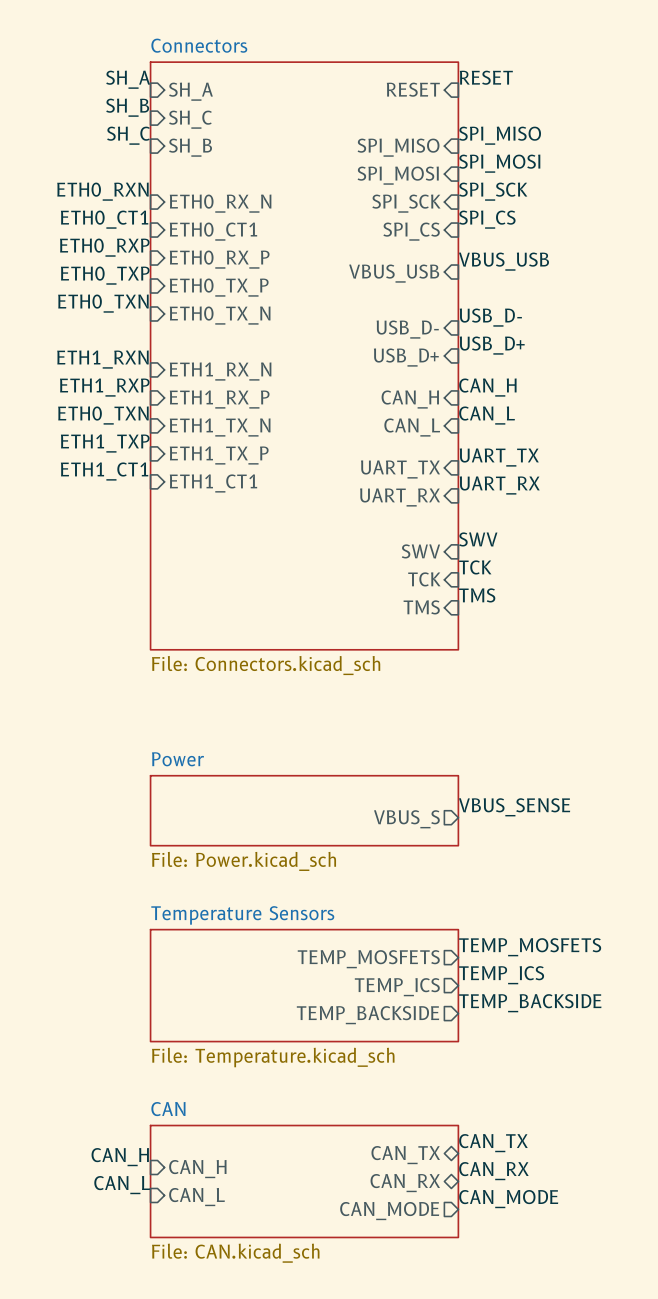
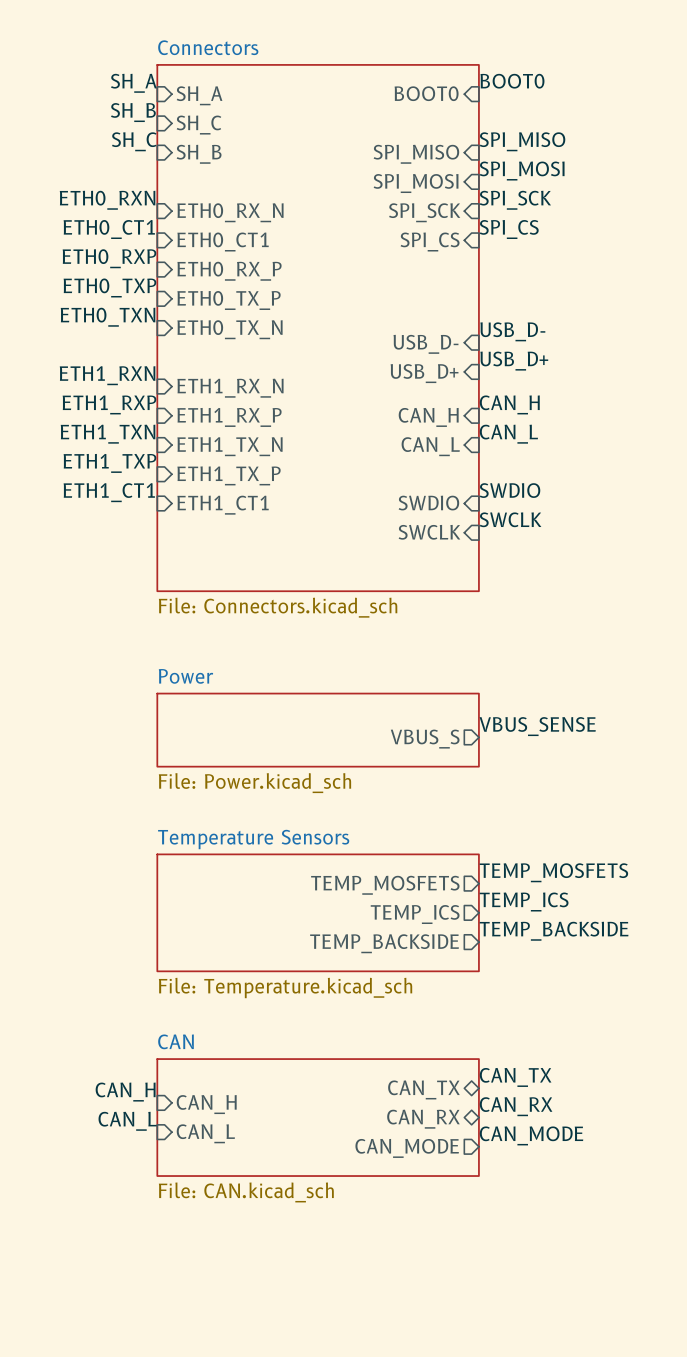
label: RESET (486, 77) -> BOOT0 (512, 81)
sheet pin: RESET (413, 89) -> BOOT0 (426, 93)
label: VBUS_USB (503, 261) -> none
sheet pin: VBUS_USB (394, 273) -> none
sheet Connectors: none -> File: Connectors.kicad_sch (318, 328)
sheet Connectors: File: Connectors.kicad_sch (304, 355) -> none
label: ETH0_TXN (103, 415) -> ETH1_TXN (108, 434)
label: UART_TX (499, 457) -> none
sheet pin: UART_TX (400, 469) -> none
label: none -> SWDIO (510, 490)
sheet pin: none -> SWDIO (428, 503)
label: UART_RX (499, 485) -> none
sheet pin: UART_RX (400, 497) -> none
label: none -> SWCLK (510, 519)
sheet pin: none -> SWCLK (429, 532)
label: SWV (478, 539) -> none
sheet pin: SWV (420, 551) -> none
label: TCK (475, 567) -> none
sheet pin: TCK (424, 579) -> none
label: TMS (477, 595) -> none
sheet pin: TMS (421, 607) -> none
label position: VBUS_SENSE (514, 807) -> VBUS_SENSE (537, 726)
sheet Power position: (304, 810) -> (318, 730)
sheet pin position: VBUS_S (406, 819) -> VBUS_S (425, 739)
label position: TEMP_MOSFETS (530, 947) -> TEMP_MOSFETS (553, 872)
sheet pin position: TEMP_MOSFETS (368, 959) -> TEMP_MOSFETS (385, 885)
label position: TEMP_ICS (501, 975) -> TEMP_ICS (524, 902)
sheet Temperature Sensors position: (304, 985) -> (318, 912)
sheet pin position: TEMP_ICS (397, 987) -> TEMP_ICS (415, 914)
label position: TEMP_BACKSIDE (530, 1003) -> TEMP_BACKSIDE (554, 931)
sheet pin position: TEMP_BACKSIDE (368, 1015) -> TEMP_BACKSIDE (384, 943)
label position: CAN_TX (493, 1143) -> CAN_TX (515, 1077)
sheet pin position: CAN_TX (405, 1155) -> CAN_TX (423, 1089)
label position: CAN_H (120, 1157) -> CAN_H (125, 1092)
sheet pin position: CAN_H (197, 1169) -> CAN_H (206, 1104)
label position: CAN_RX (493, 1171) -> CAN_RX (516, 1106)
sheet CAN position: (304, 1181) -> (318, 1117)
sheet pin position: CAN_RX (405, 1183) -> CAN_RX (423, 1119)
label position: CAN_L (122, 1185) -> CAN_L (127, 1121)
sheet pin position: CAN_L (197, 1197) -> CAN_L (205, 1133)
label position: CAN_MODE (508, 1199) -> CAN_MODE (531, 1135)
sheet pin position: CAN_MODE (389, 1211) -> CAN_MODE (407, 1148)

